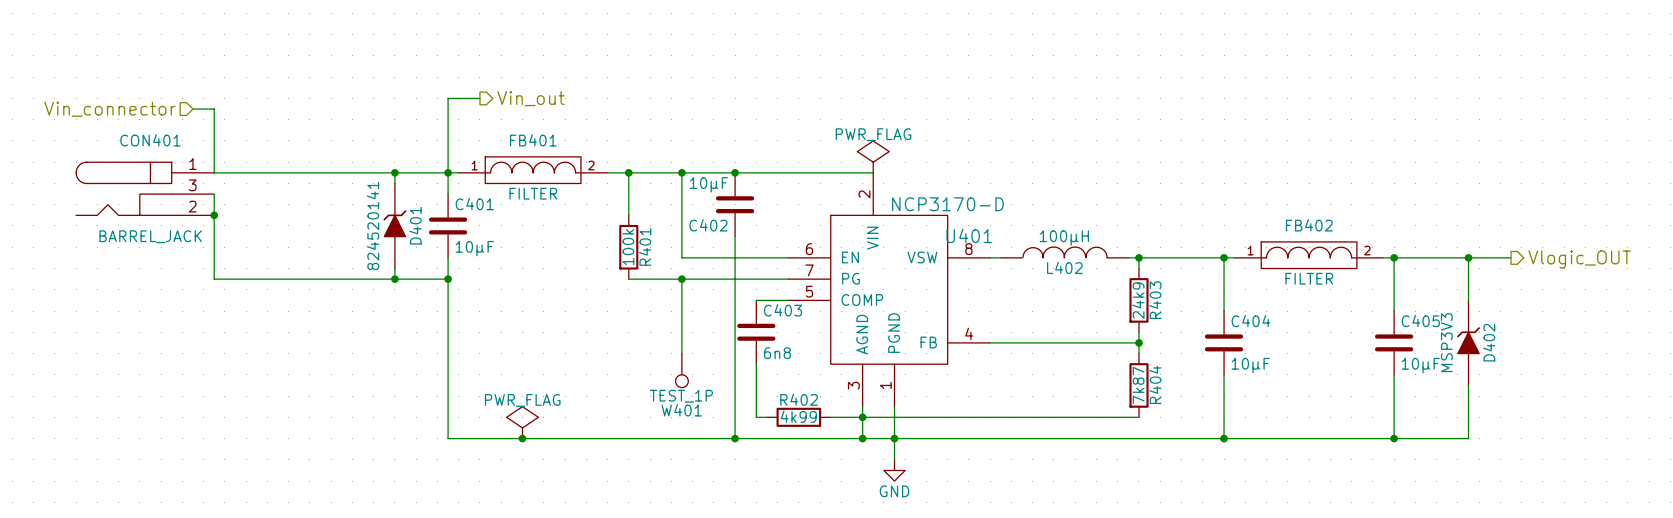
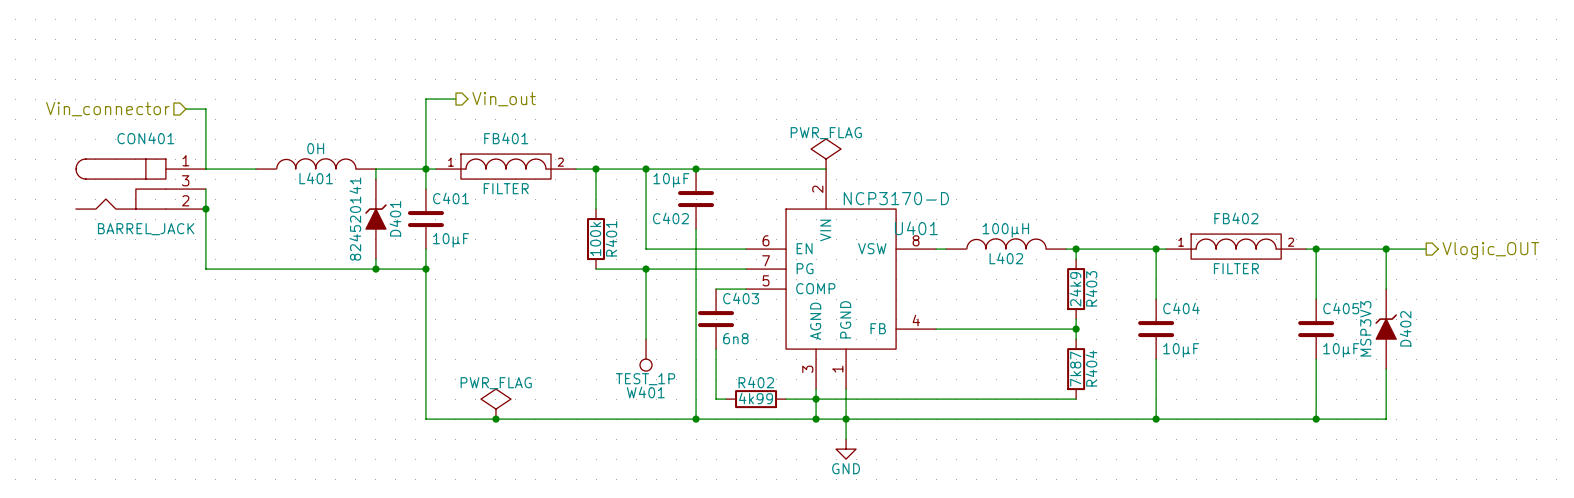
L401: none -> 0H (315, 163)
wire: (267, 172) (394, 172) -> none
junction: (394, 172) -> none

